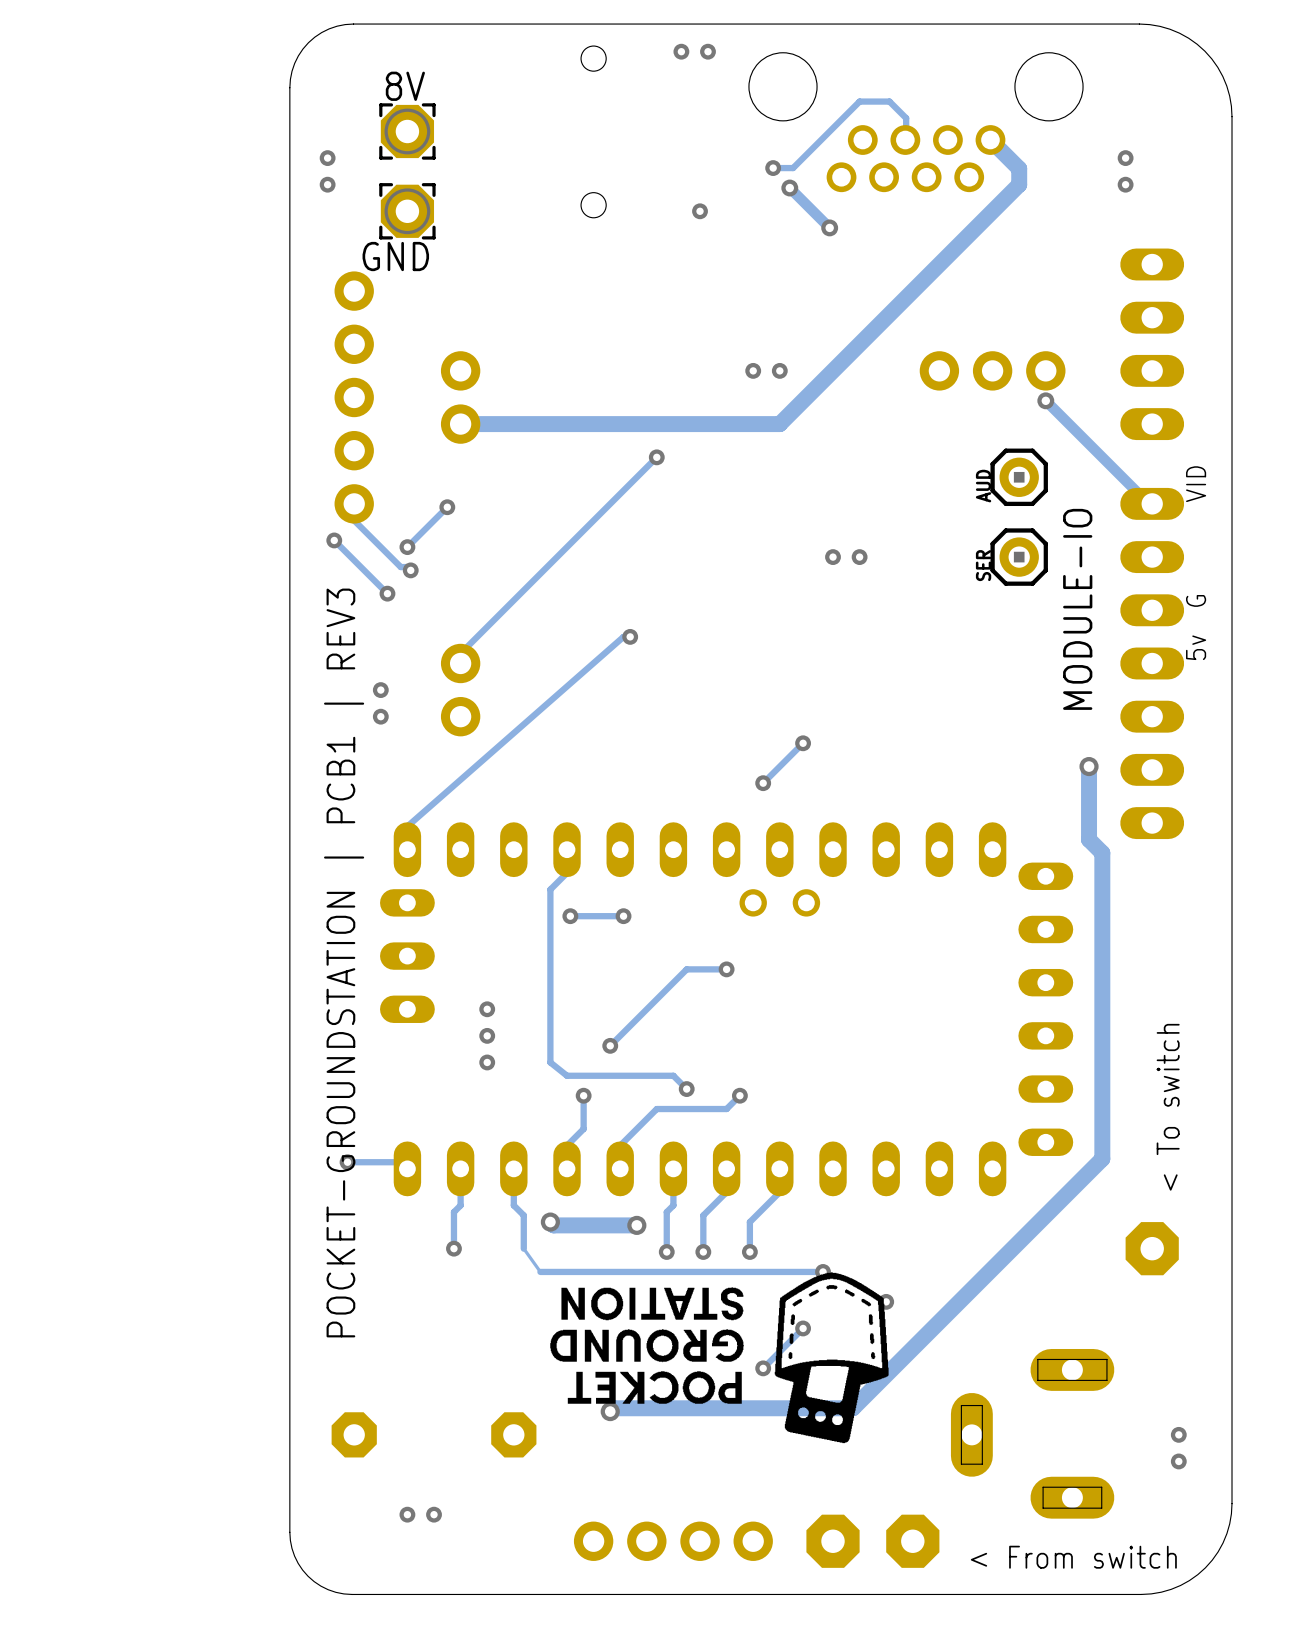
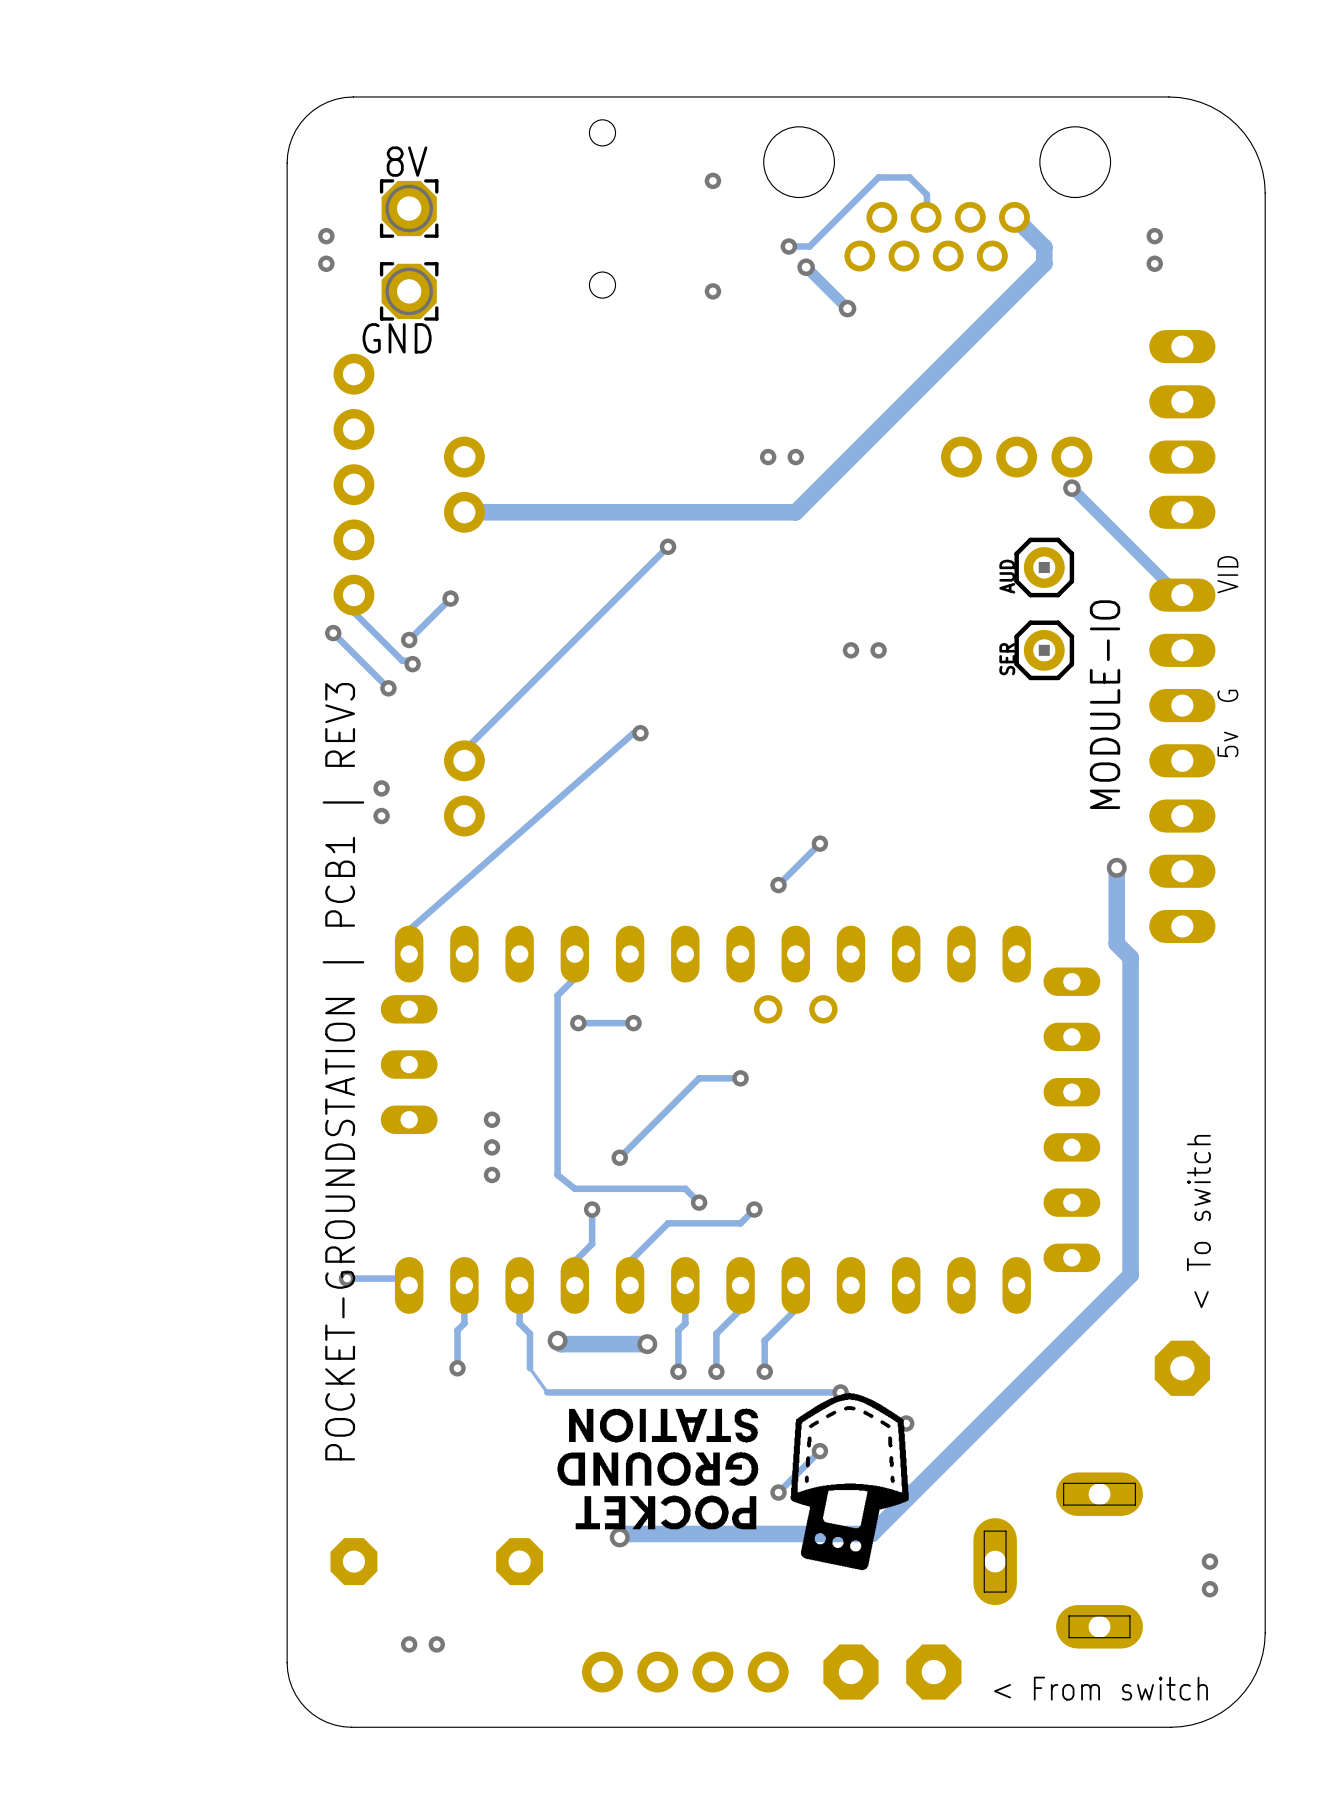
via: (681, 51) -> none
via: (707, 51) -> none
via: none -> (712, 180)

